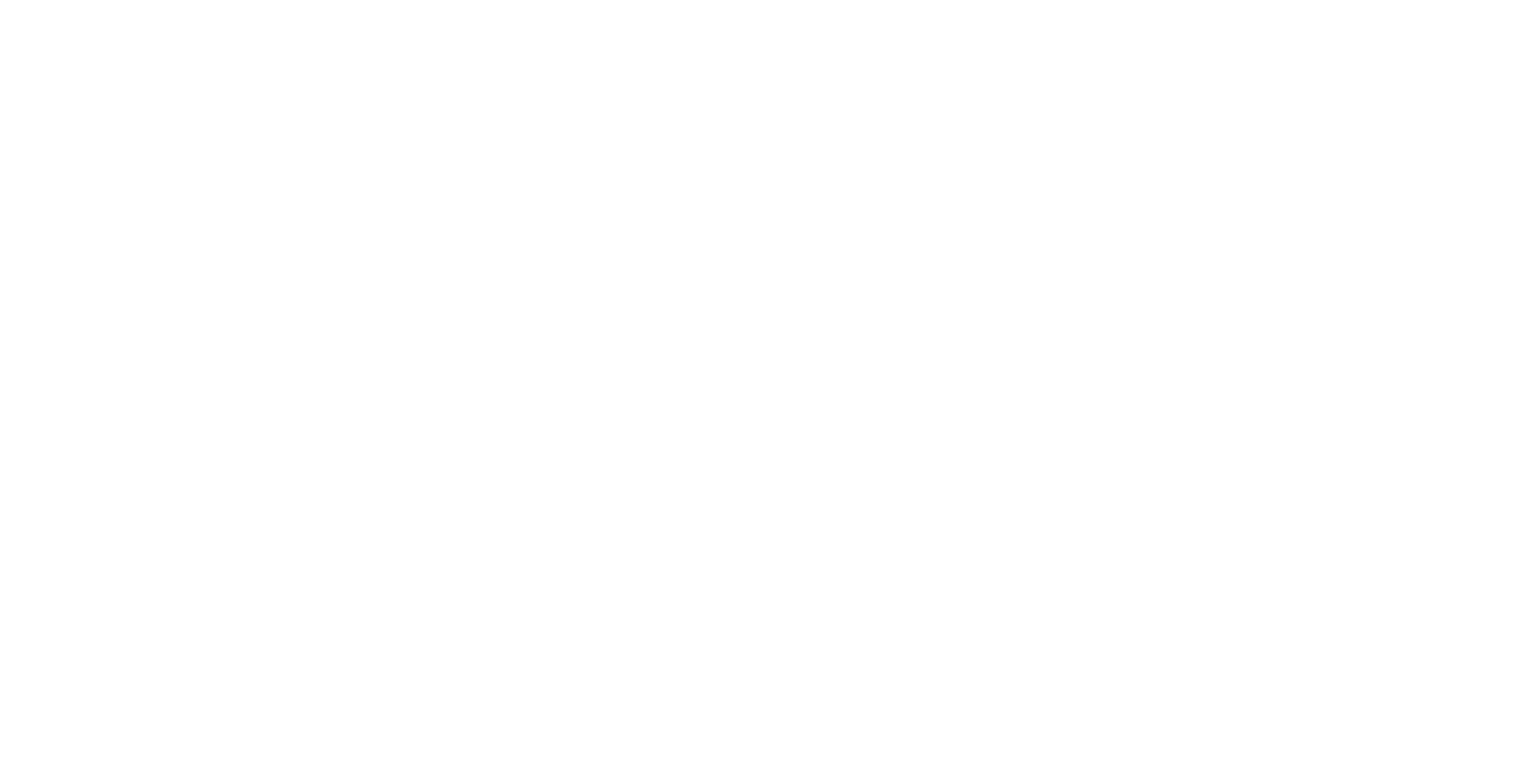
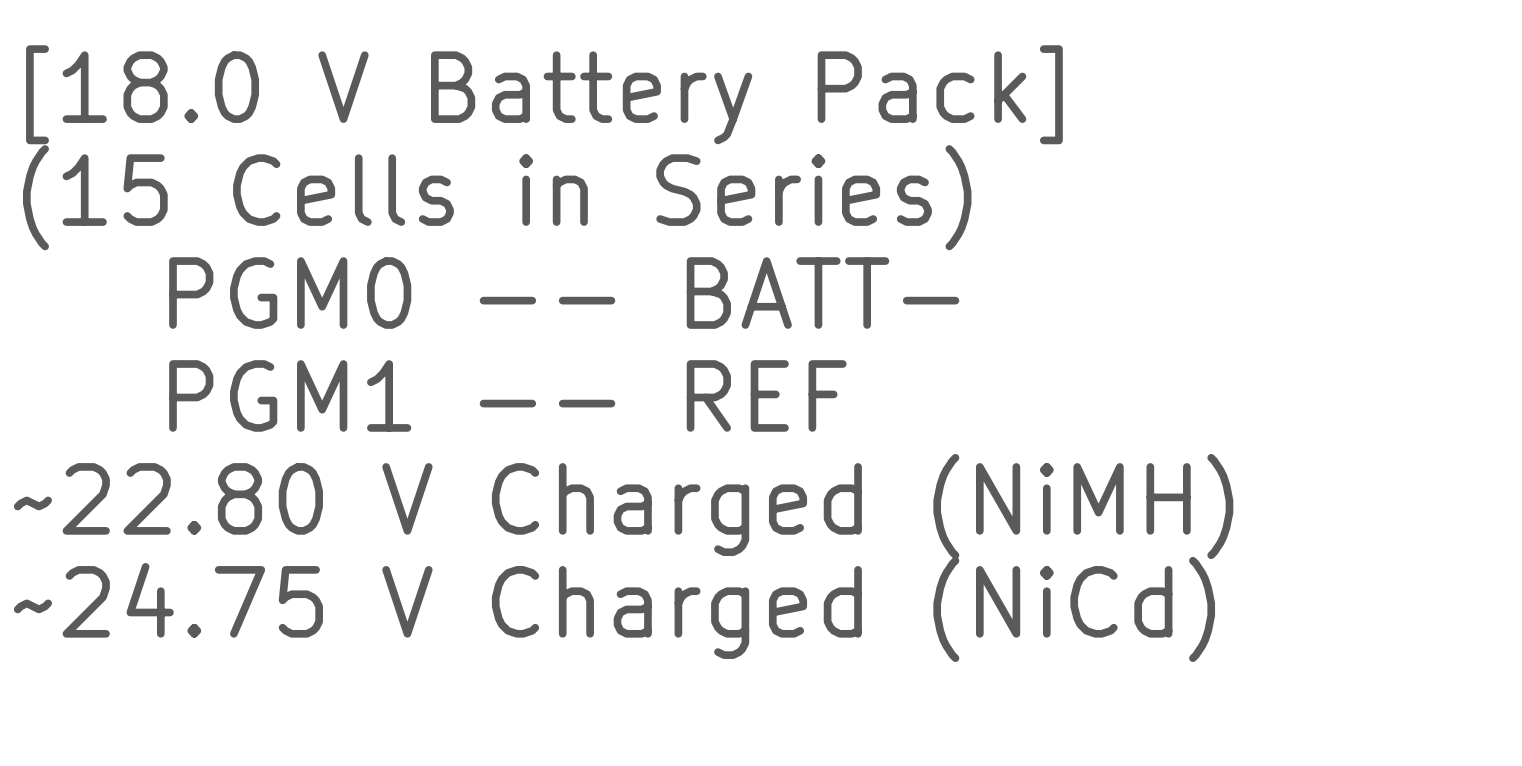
text: none -> [18.0 V Battery Pack] (544, 94)
text: none -> (15 Cells in Series) (497, 197)
text: none -> PGM0 -- BATT- (564, 293)
text: none -> PGM1 -- REF (507, 395)
text: none -> ~22.80 V Charged (NiMH) (623, 506)
text: none -> ~24.75 V Charged (NiCd) (614, 609)

